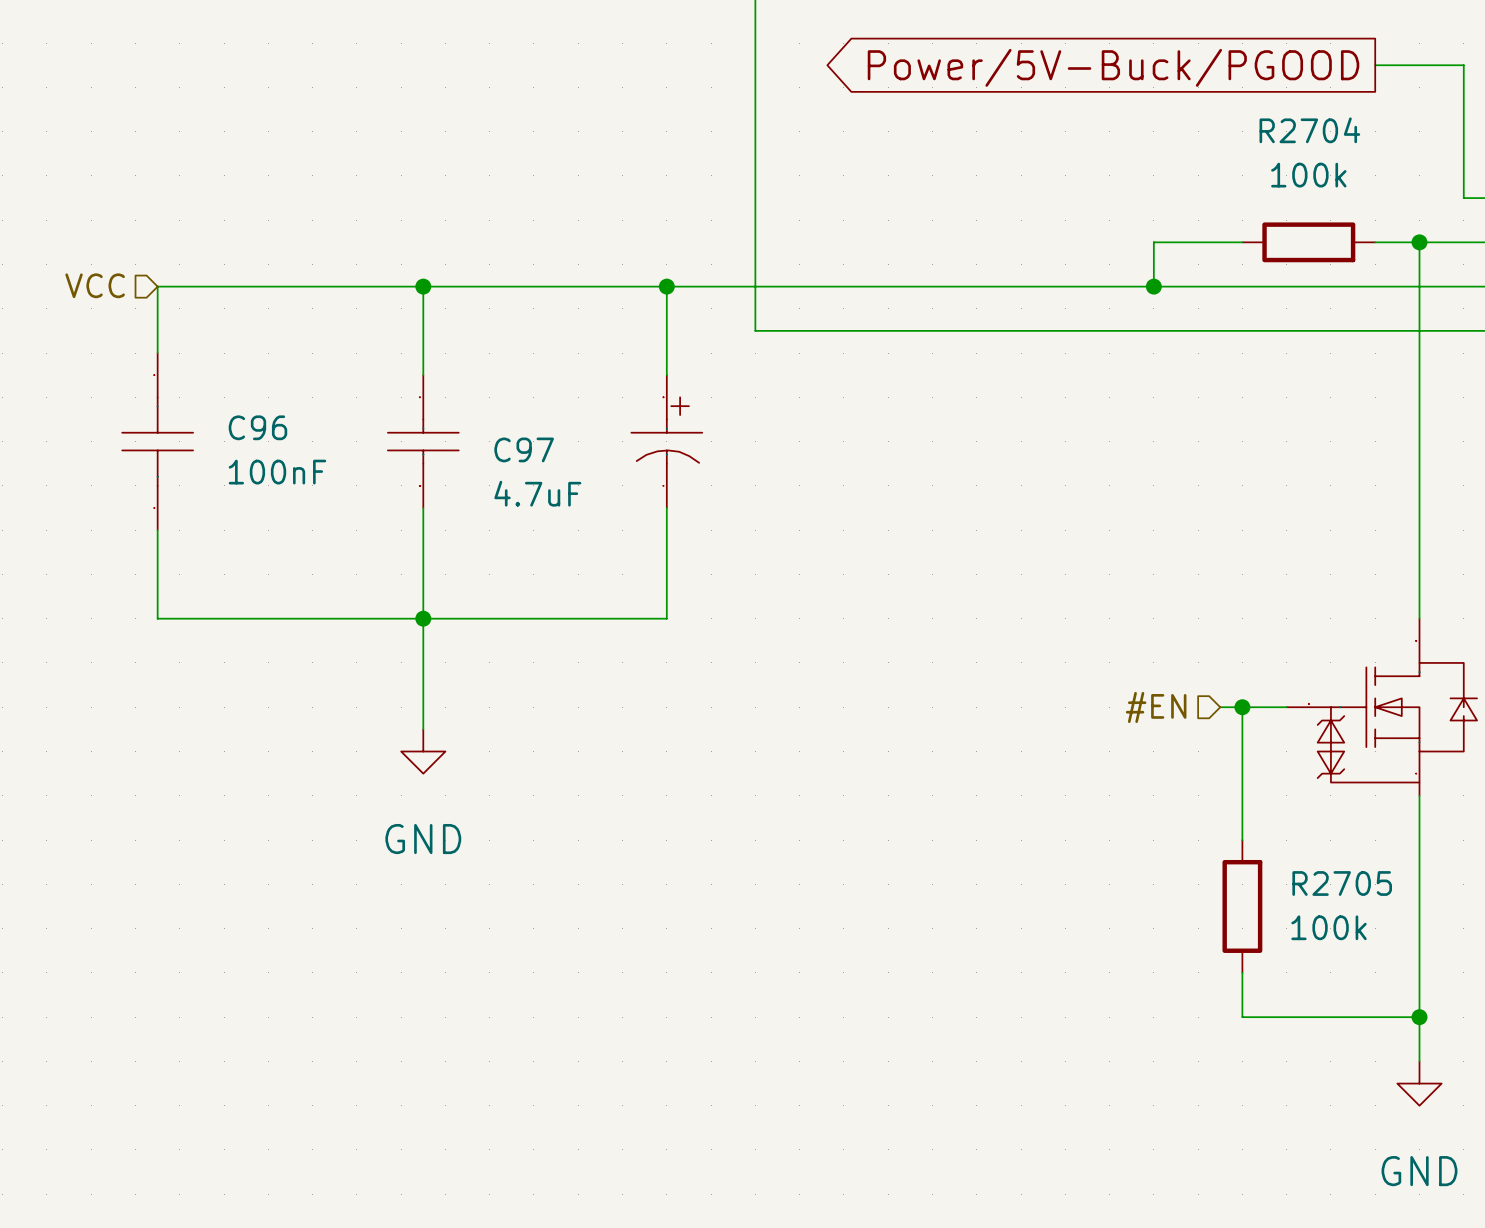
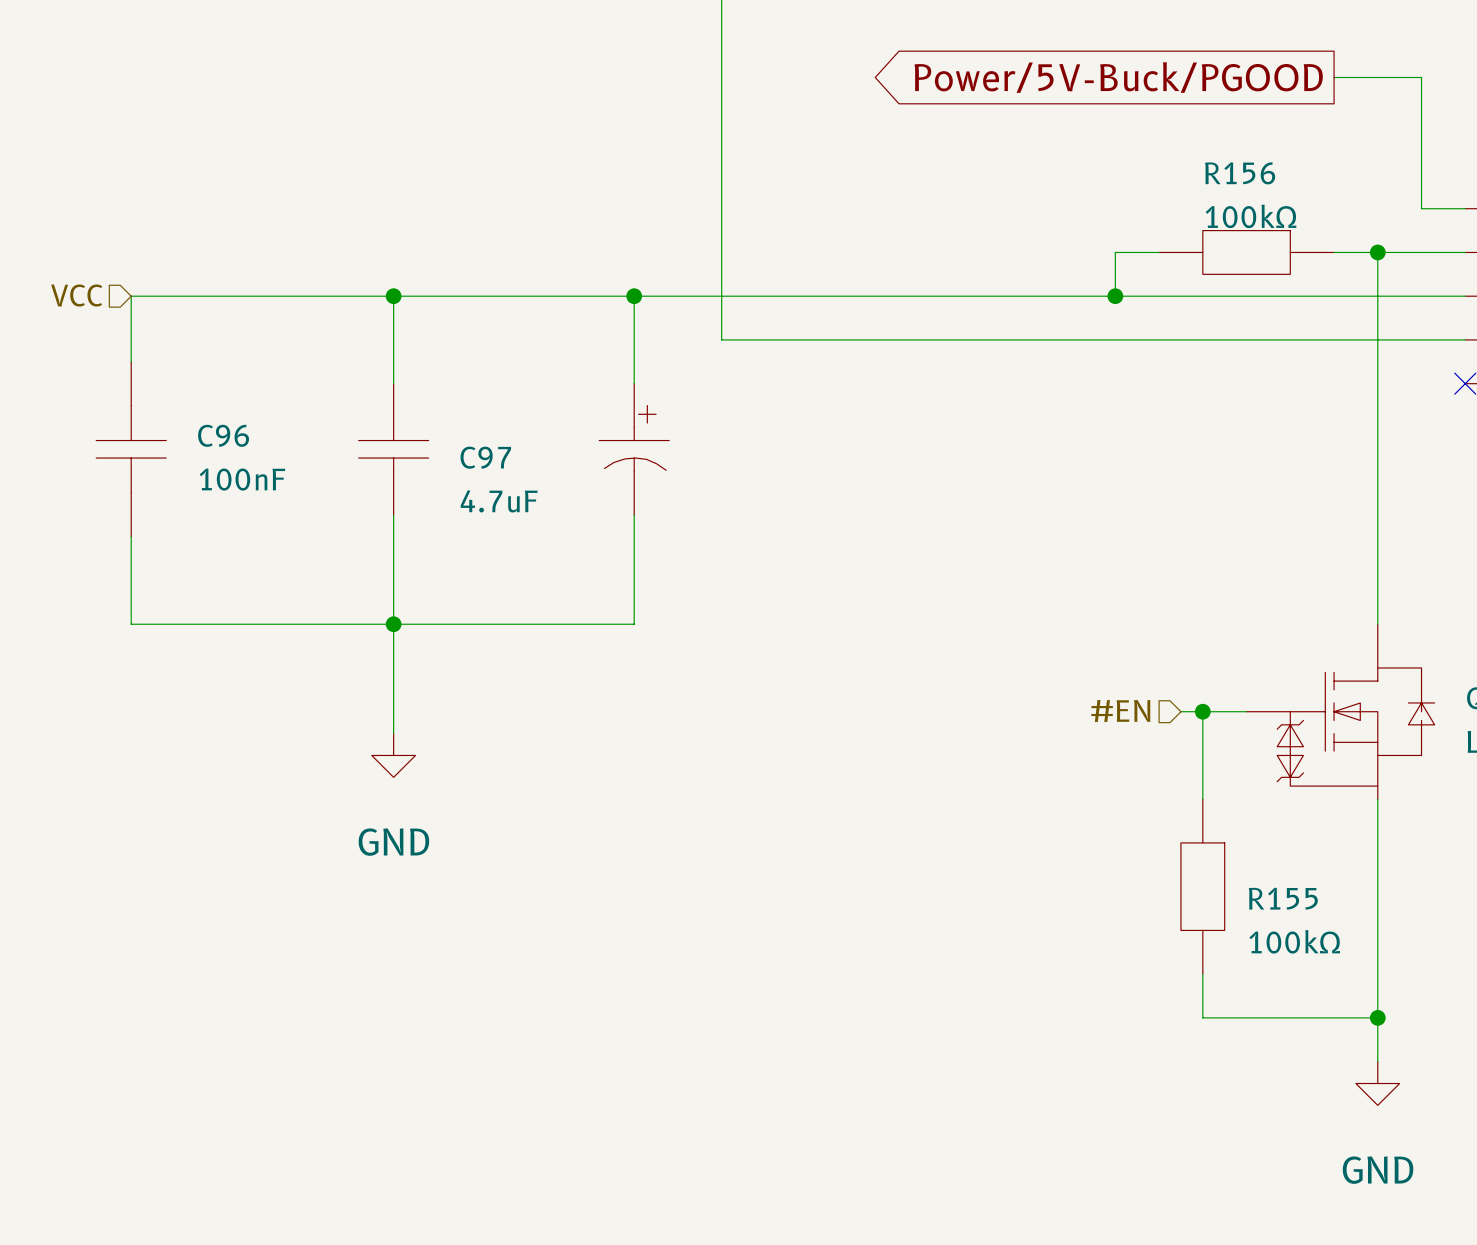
R156: none -> 100kΩ (1246, 252)
R2704: 100k (1308, 242) -> none
R155: none -> 100kΩ (1202, 886)
R2705: 100k (1242, 906) -> none

